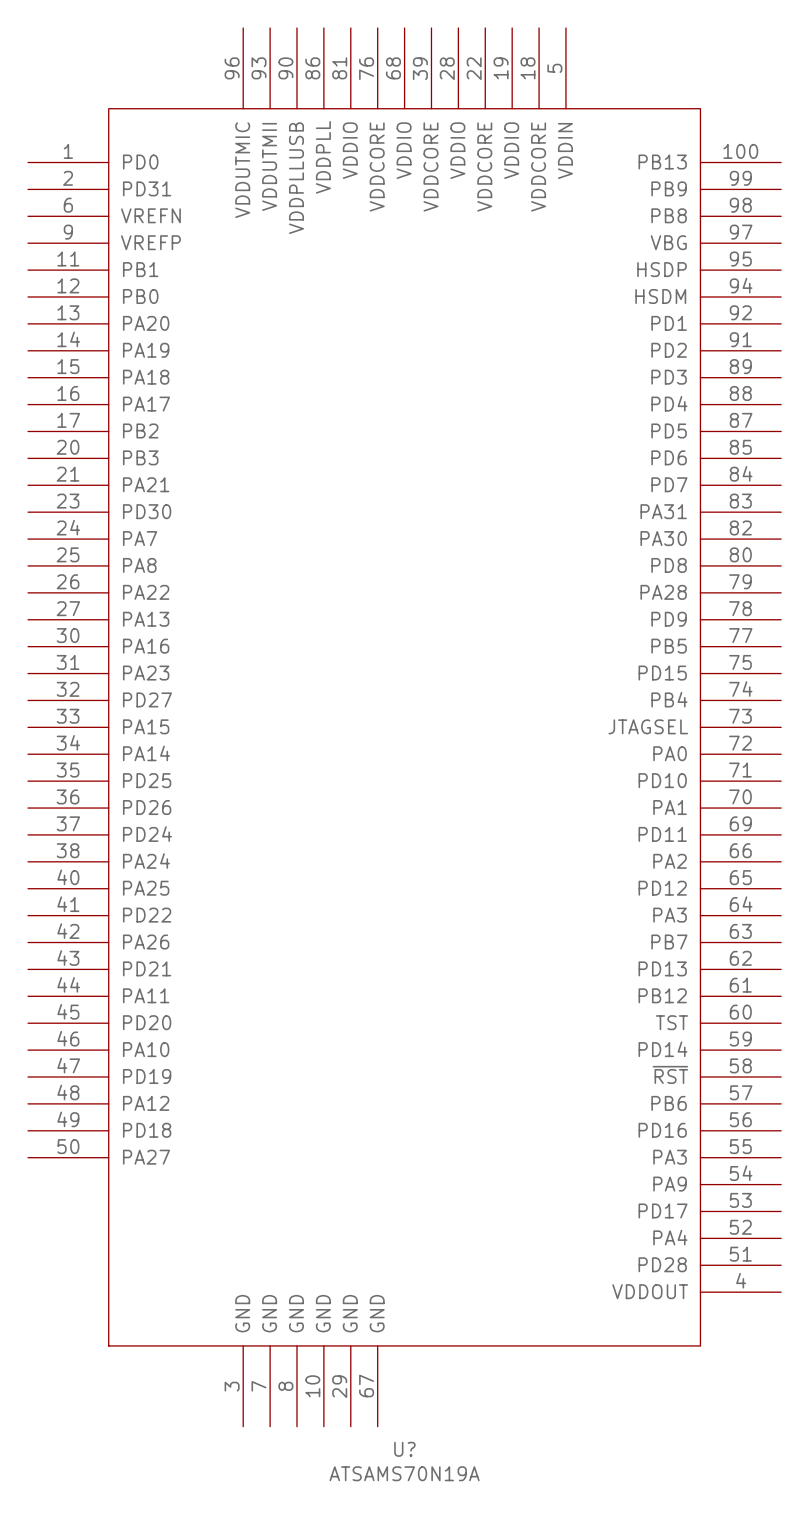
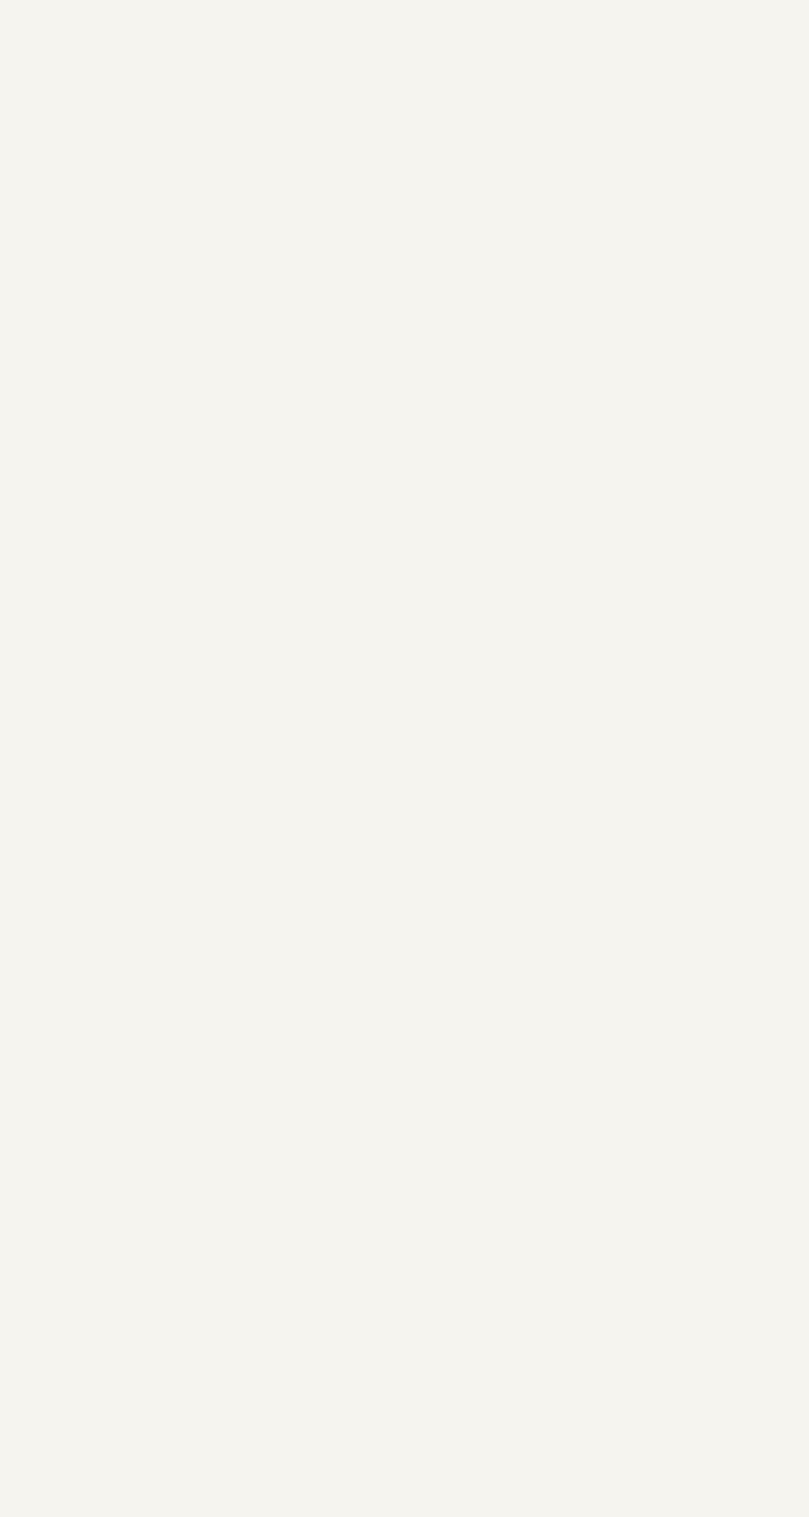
U?: ATSAMS70N19A (404, 727) -> none

